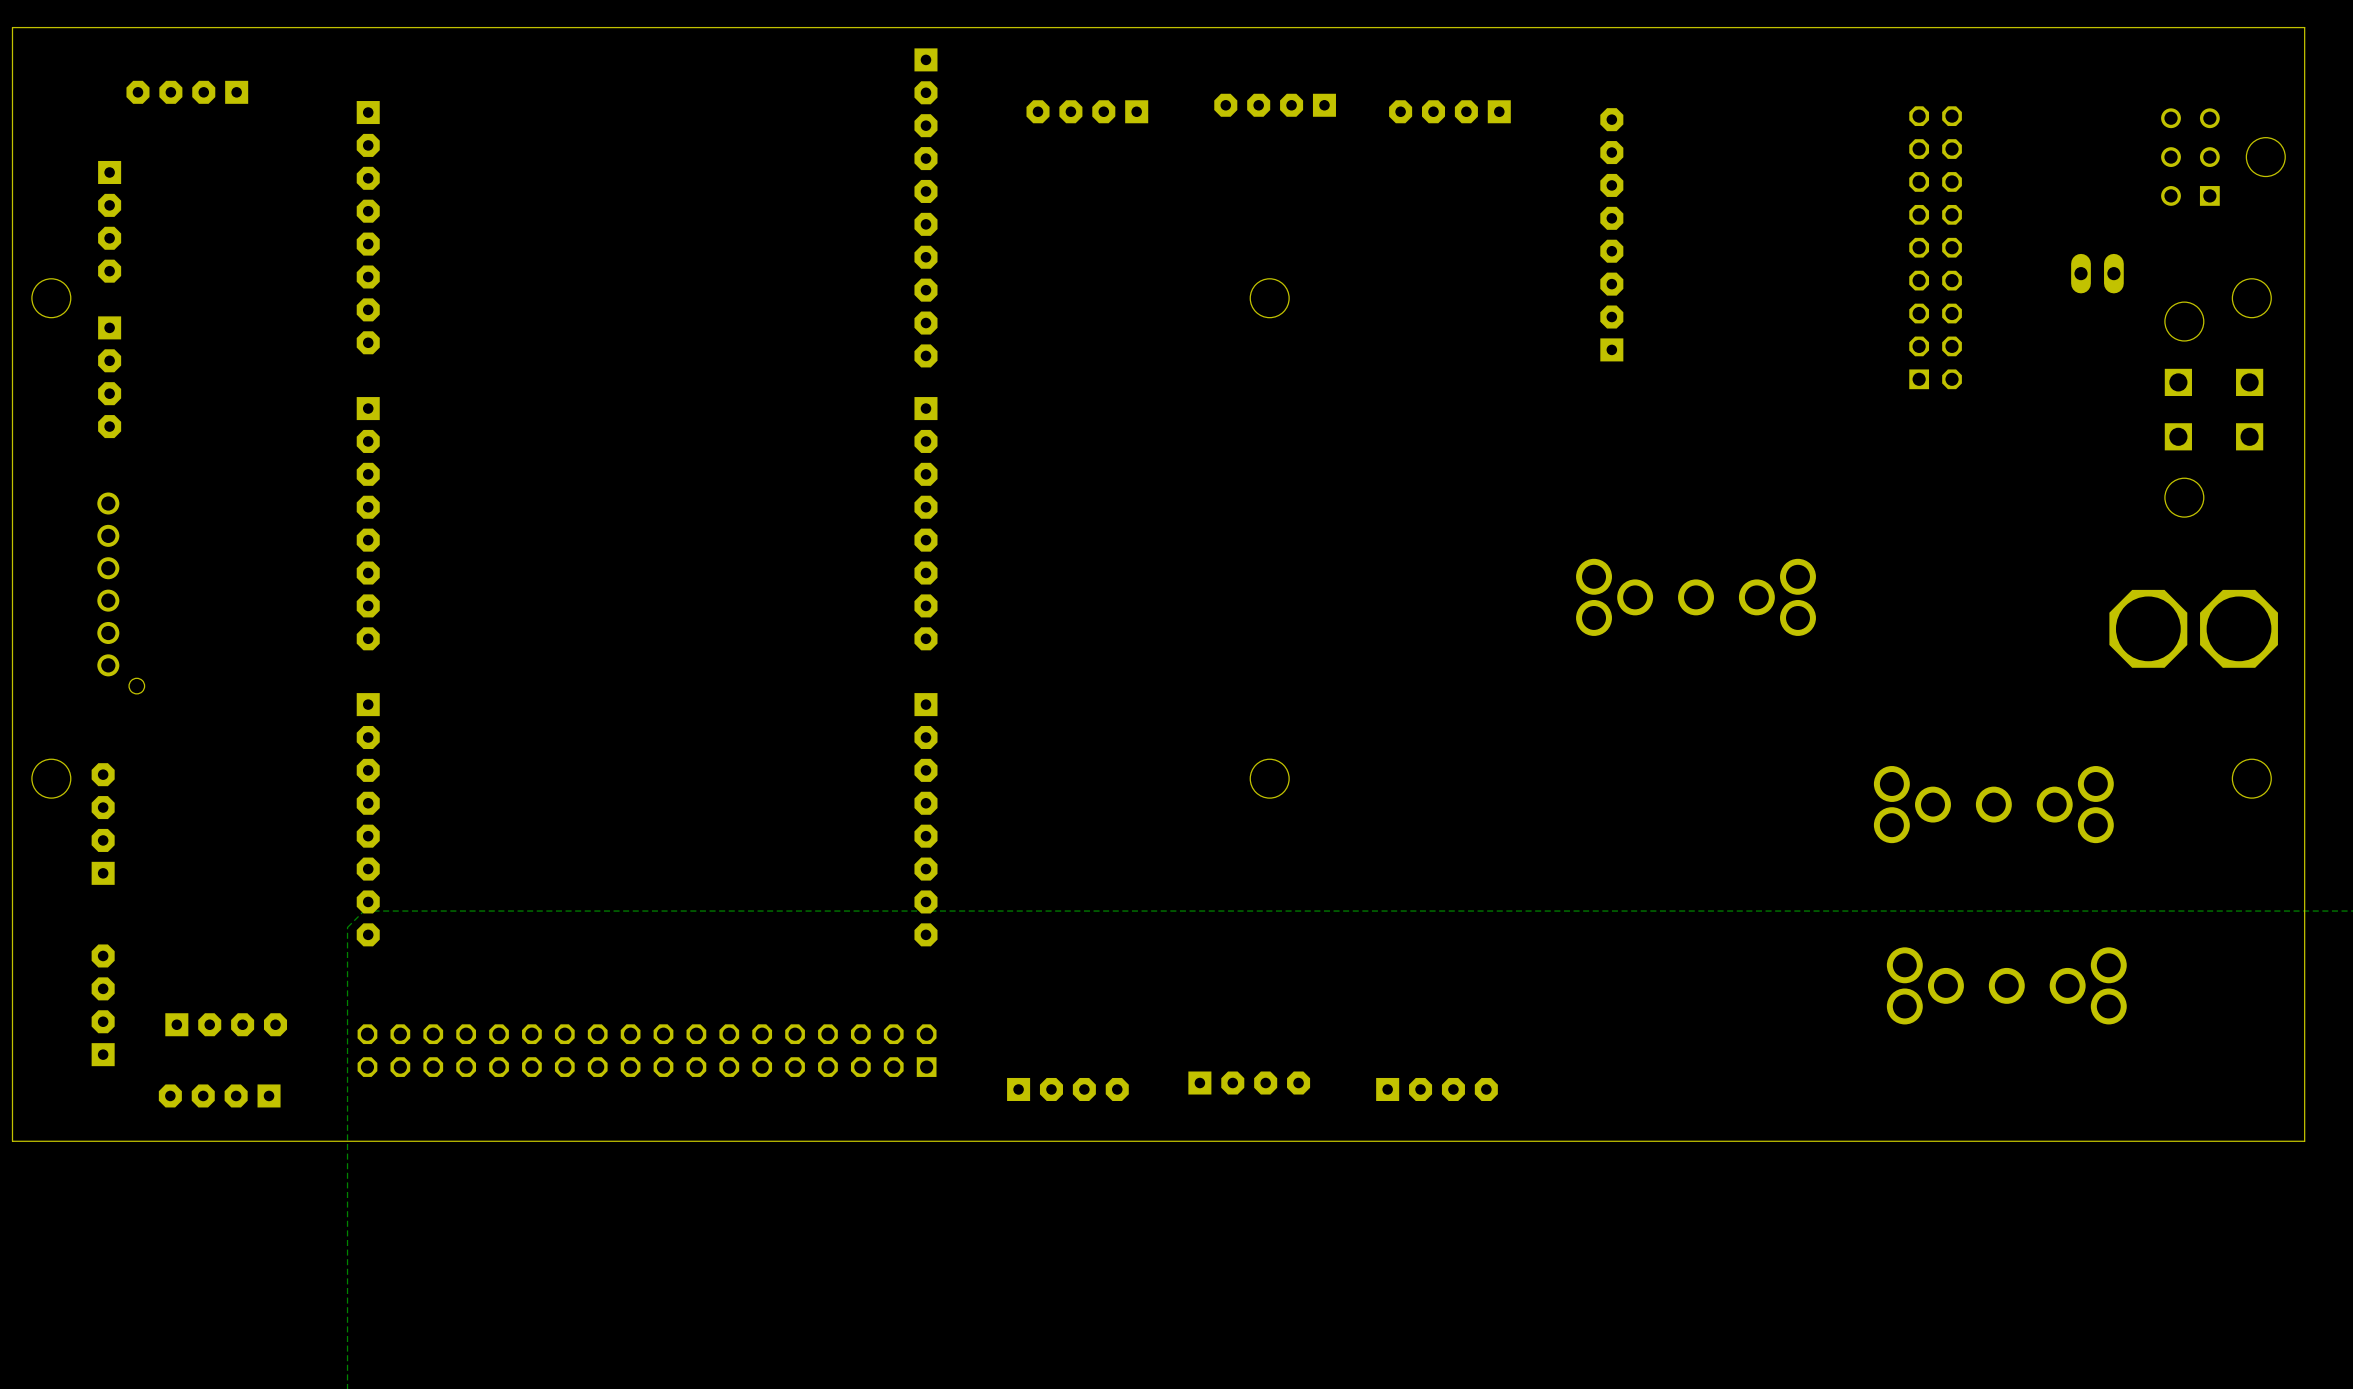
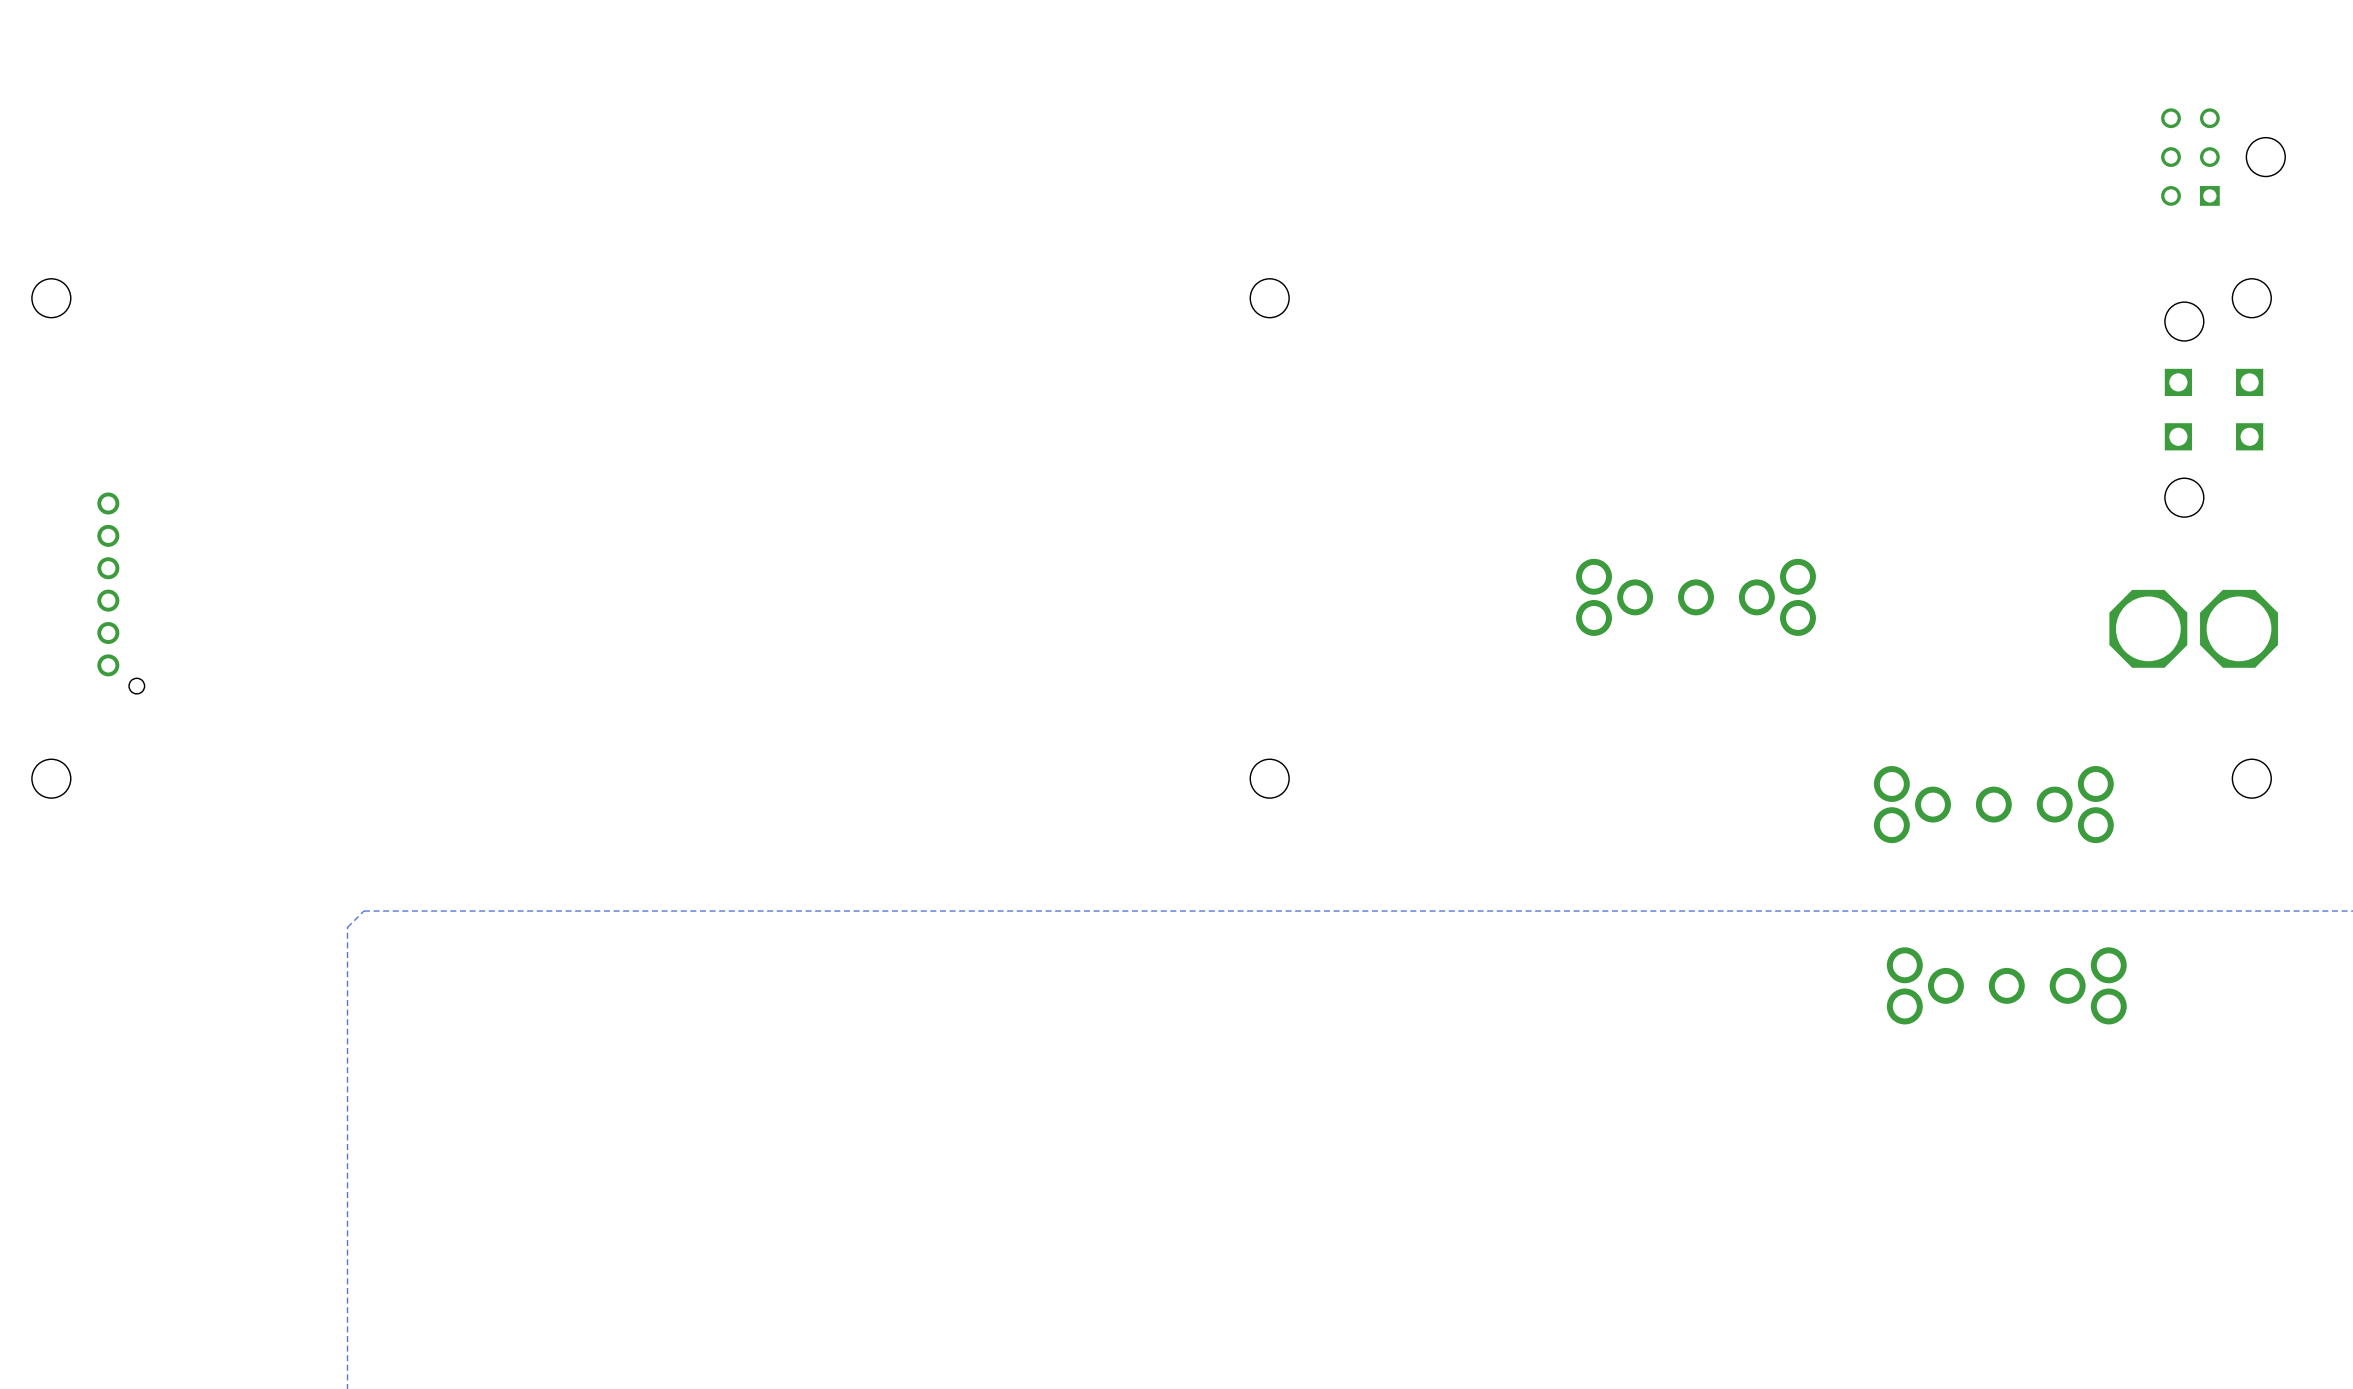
board edge: (2304, 27) (12, 27) (12, 1141) (2304, 1141) (2304, 27) -> none
part: (187, 92) -> none
part: (1275, 105) -> none
part: (1087, 111) -> none
part: (1449, 111) -> none
part: (925, 207) -> none
part: (109, 221) -> none
part: (368, 227) -> none
part: (1611, 234) -> none
part: (1935, 247) -> none
part: (2097, 273) -> none
part: (109, 377) -> none
part: (368, 523) -> none
part: (925, 523) -> none
part: (368, 819) -> none
part: (925, 819) -> none
part: (103, 824) -> none
part: (103, 1005) -> none
part: (226, 1024) -> none
part: (647, 1050) -> none
part: (1249, 1083) -> none
part: (1067, 1089) -> none
part: (1437, 1089) -> none
part: (219, 1095) -> none

